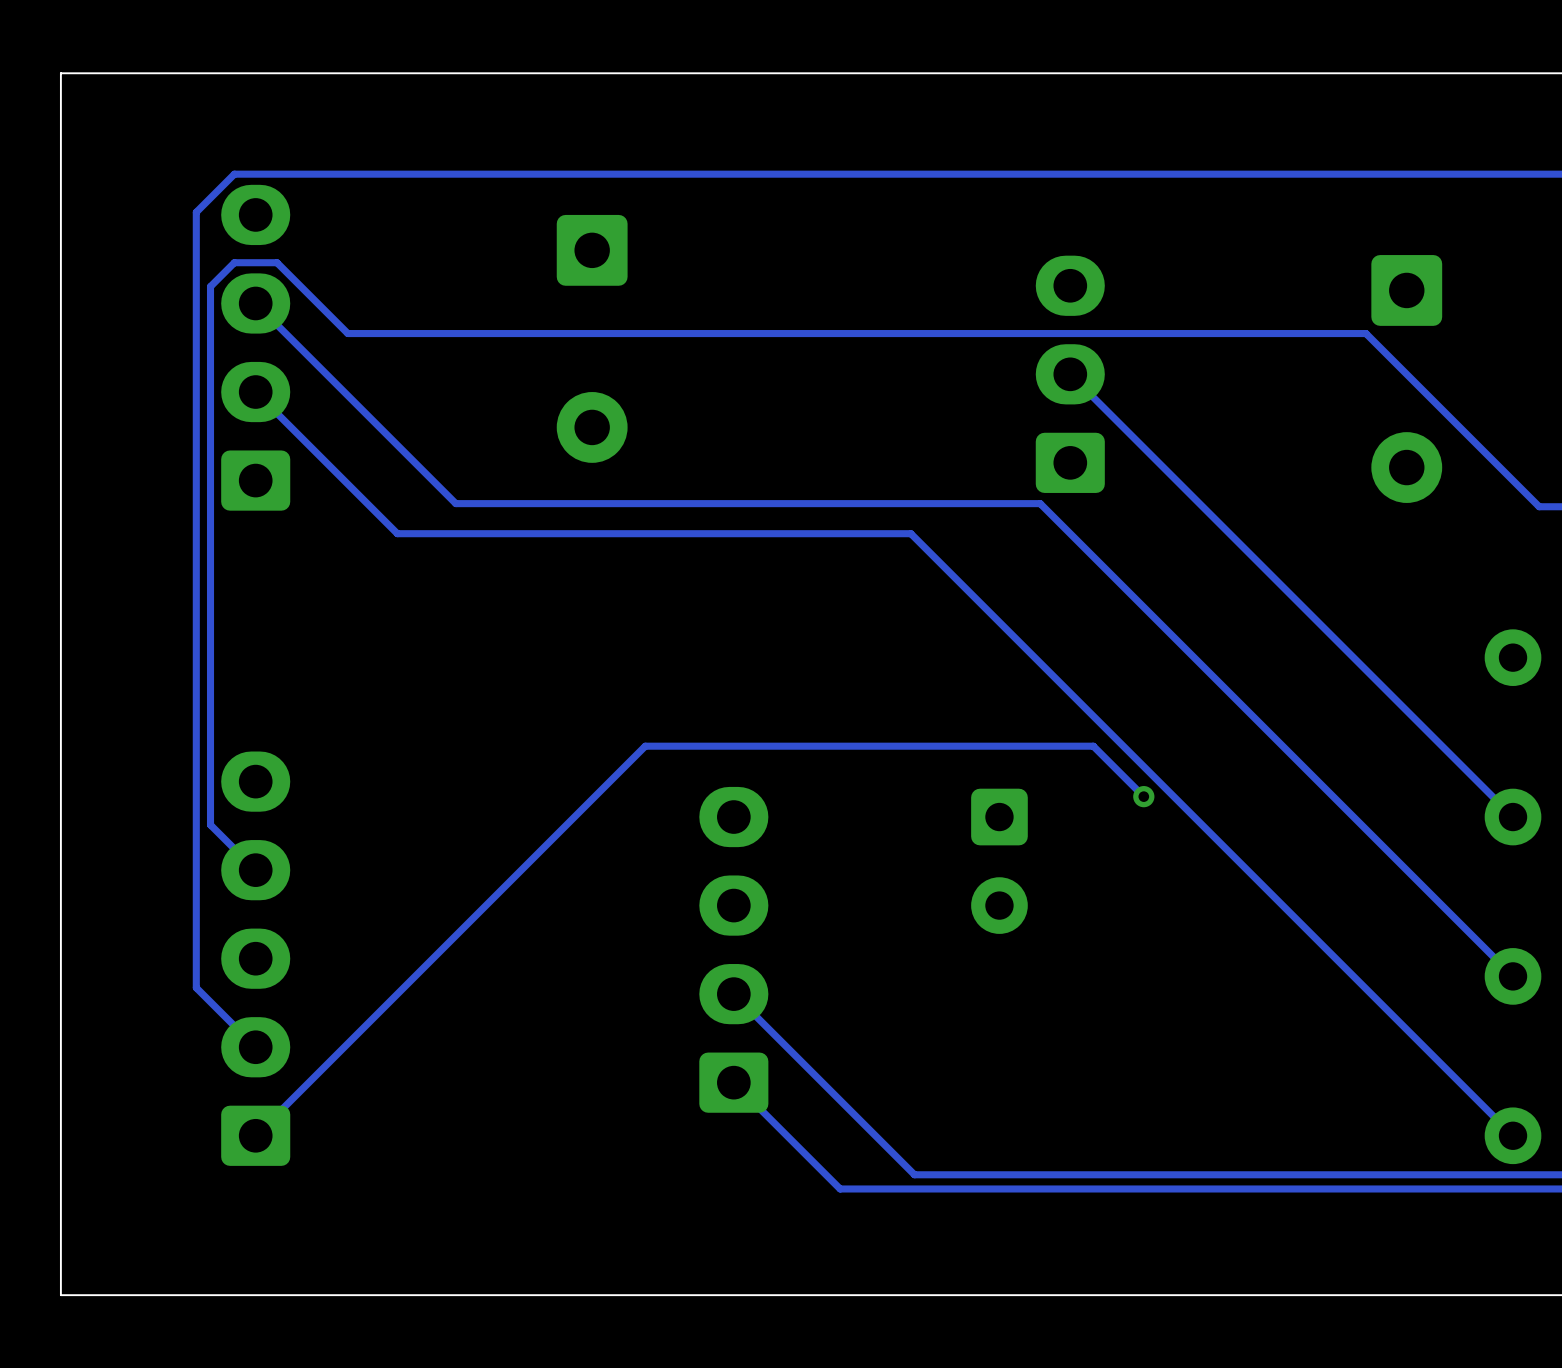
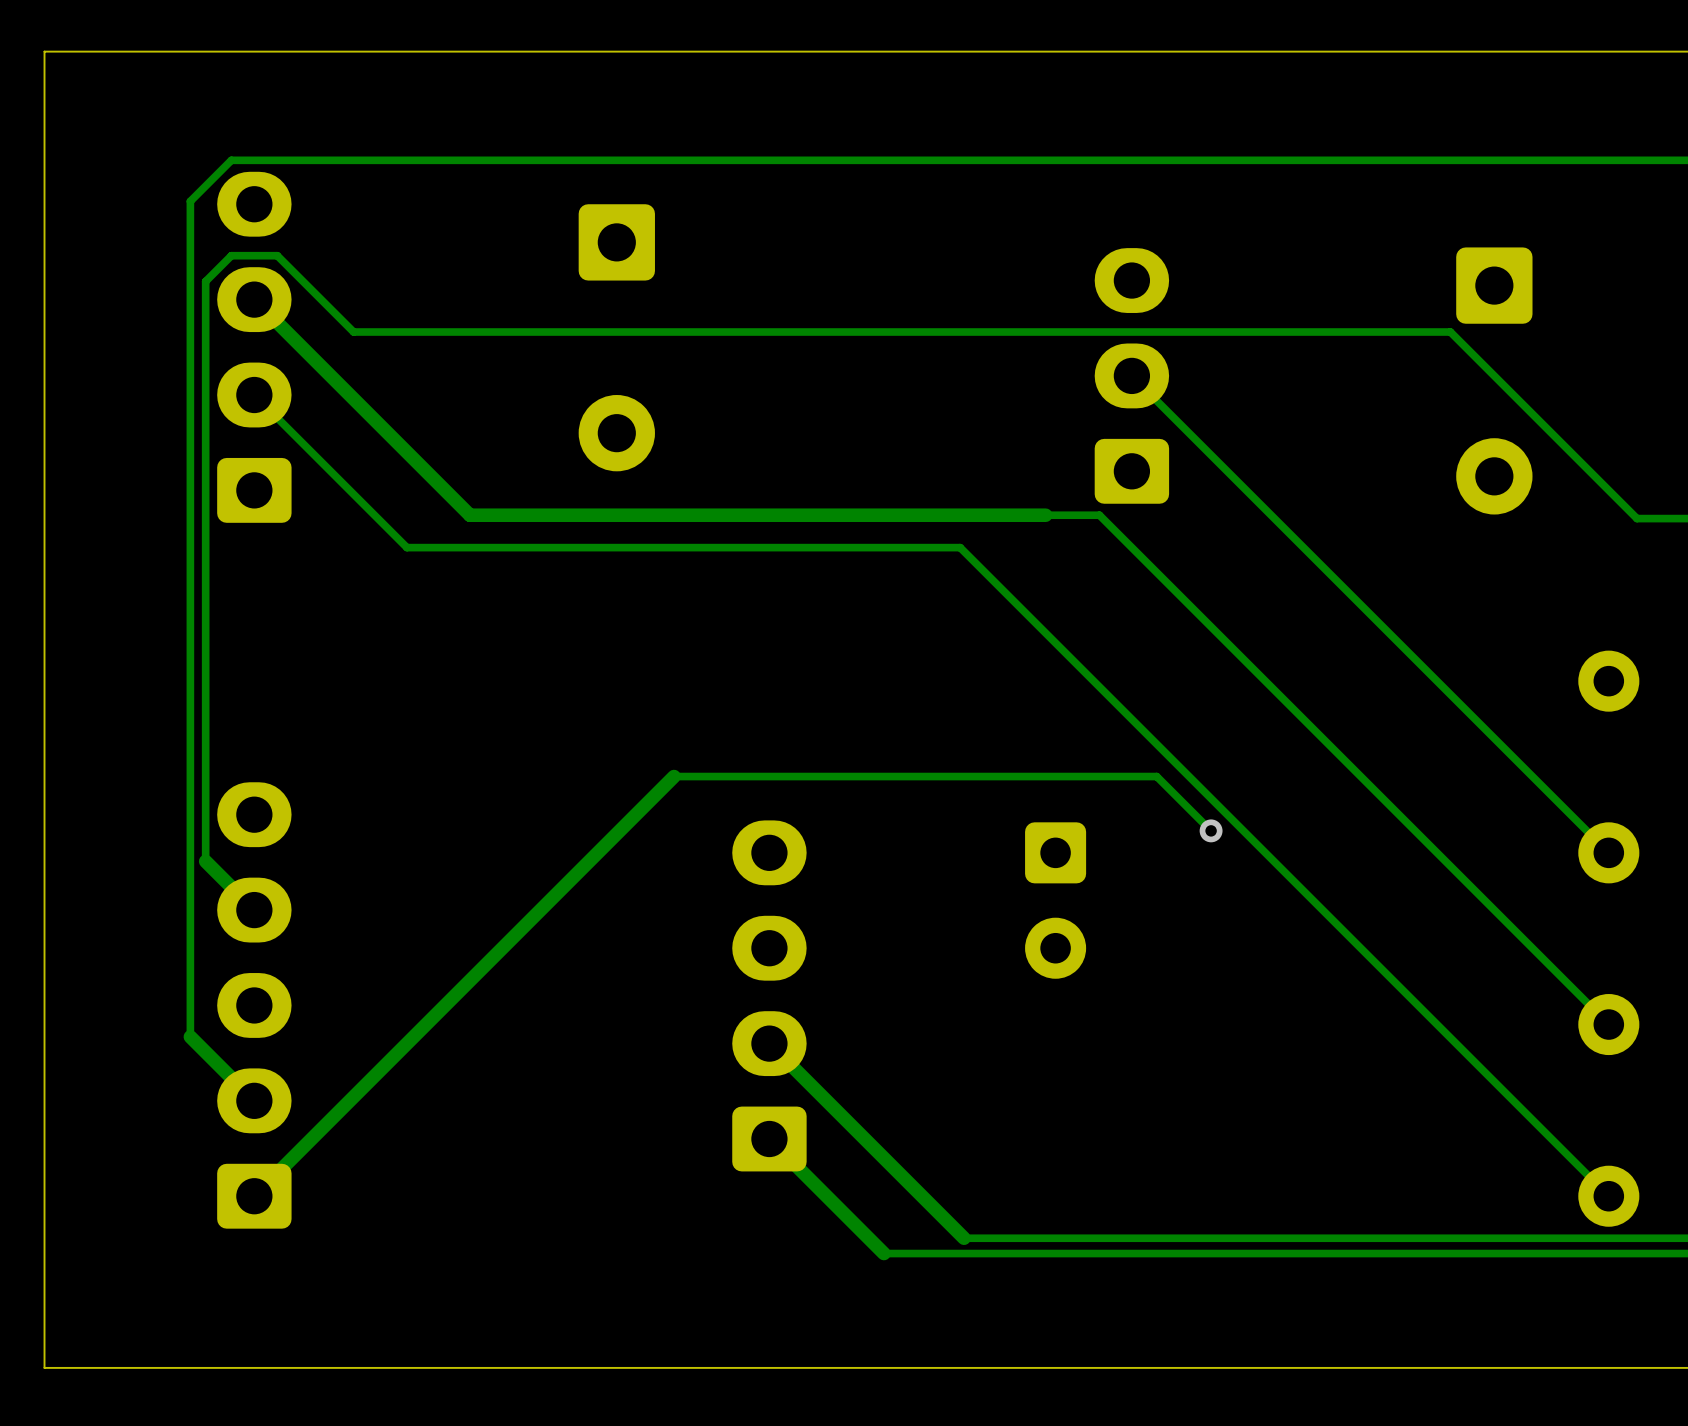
track width: thin (255, 303) (455, 503) (990, 503) -> thick (254, 299) (469, 515) (1045, 515)
track width: thin (645, 746) (255, 1135) -> thick (674, 776) (254, 1196)
track width: thin (210, 824) (255, 870) -> thick (205, 861) (254, 910)
track width: thin (196, 987) (255, 1047) -> thick (190, 1036) (254, 1100)
track width: thin (733, 994) (914, 1174) -> thick (769, 1043) (964, 1238)
track width: thin (733, 1082) (840, 1188) -> thick (769, 1139) (883, 1253)

